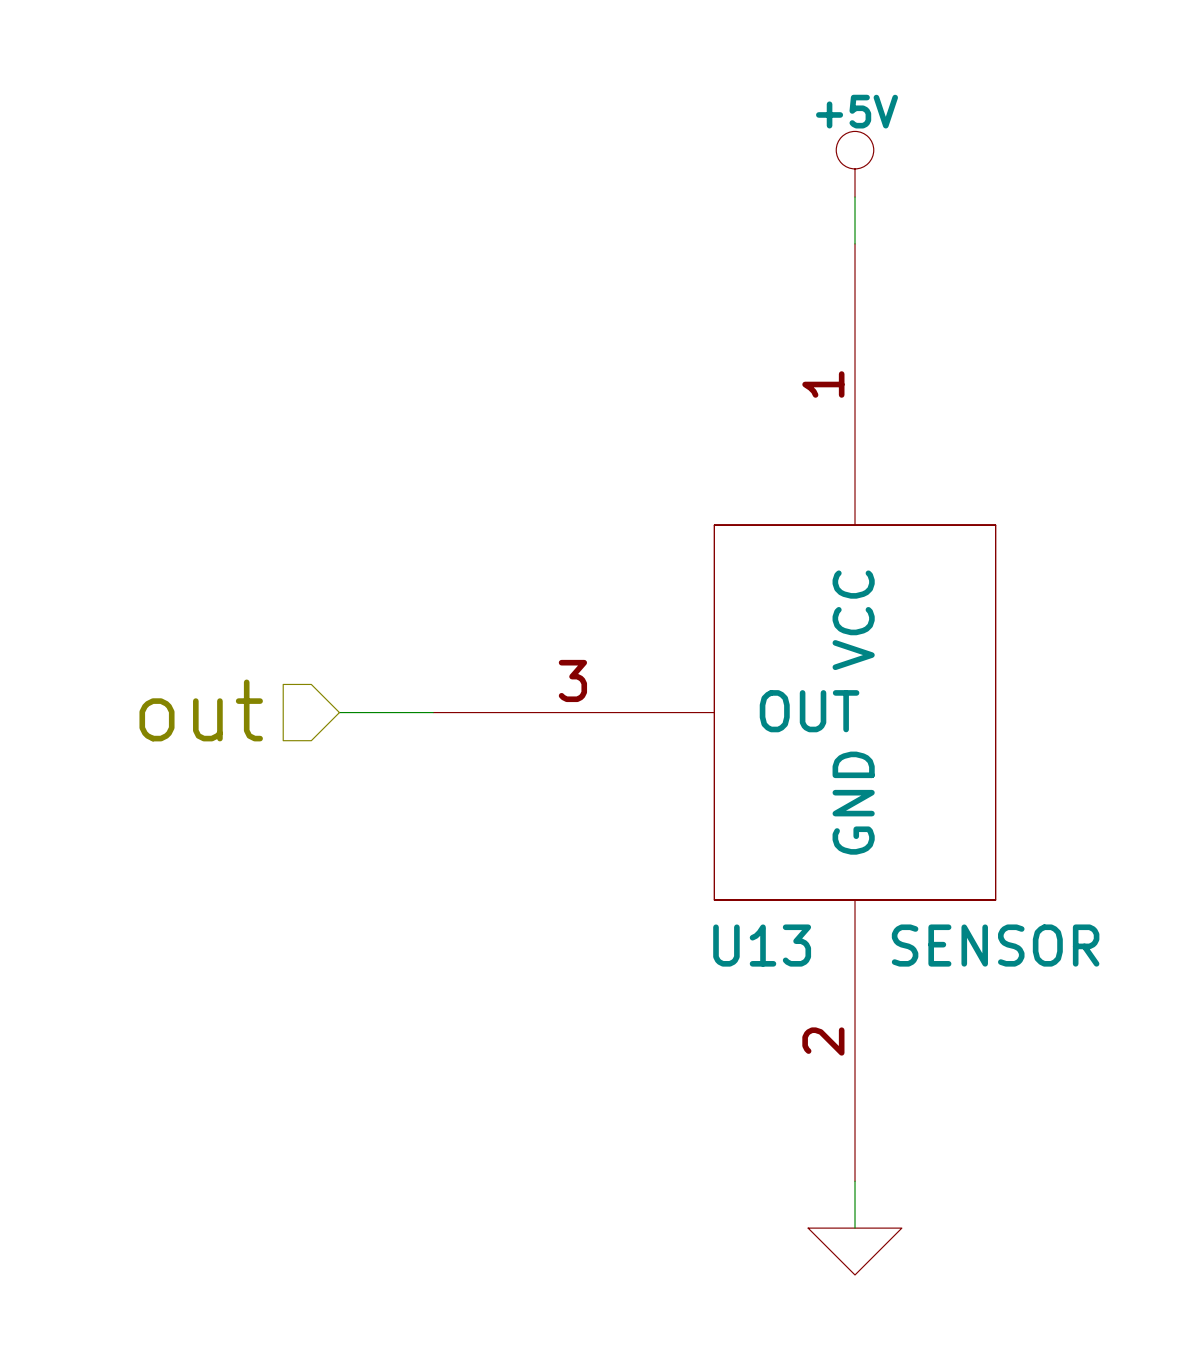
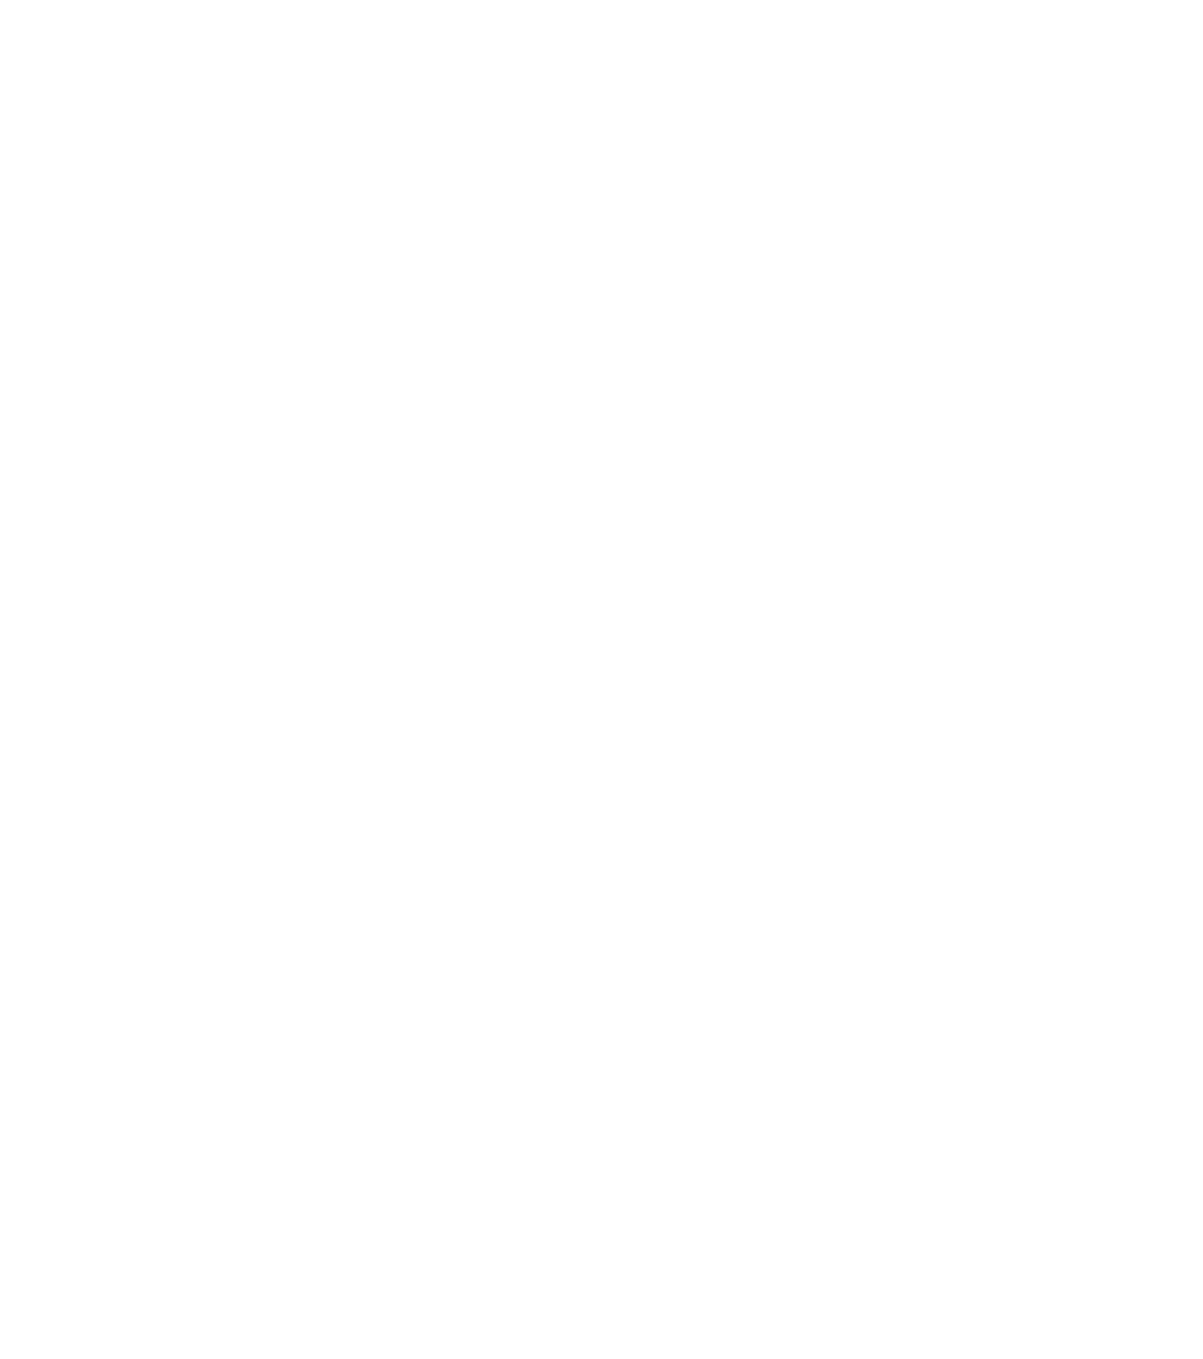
power symbol: +5V (855, 164) -> none
wire: (855, 197) (855, 243) -> none
hierarchical label: out (201, 710) -> none
wire: (339, 712) (433, 712) -> none
U13: SENSOR (714, 712) -> none
wire: (855, 1181) (855, 1228) -> none
power symbol: (855, 1251) -> none

